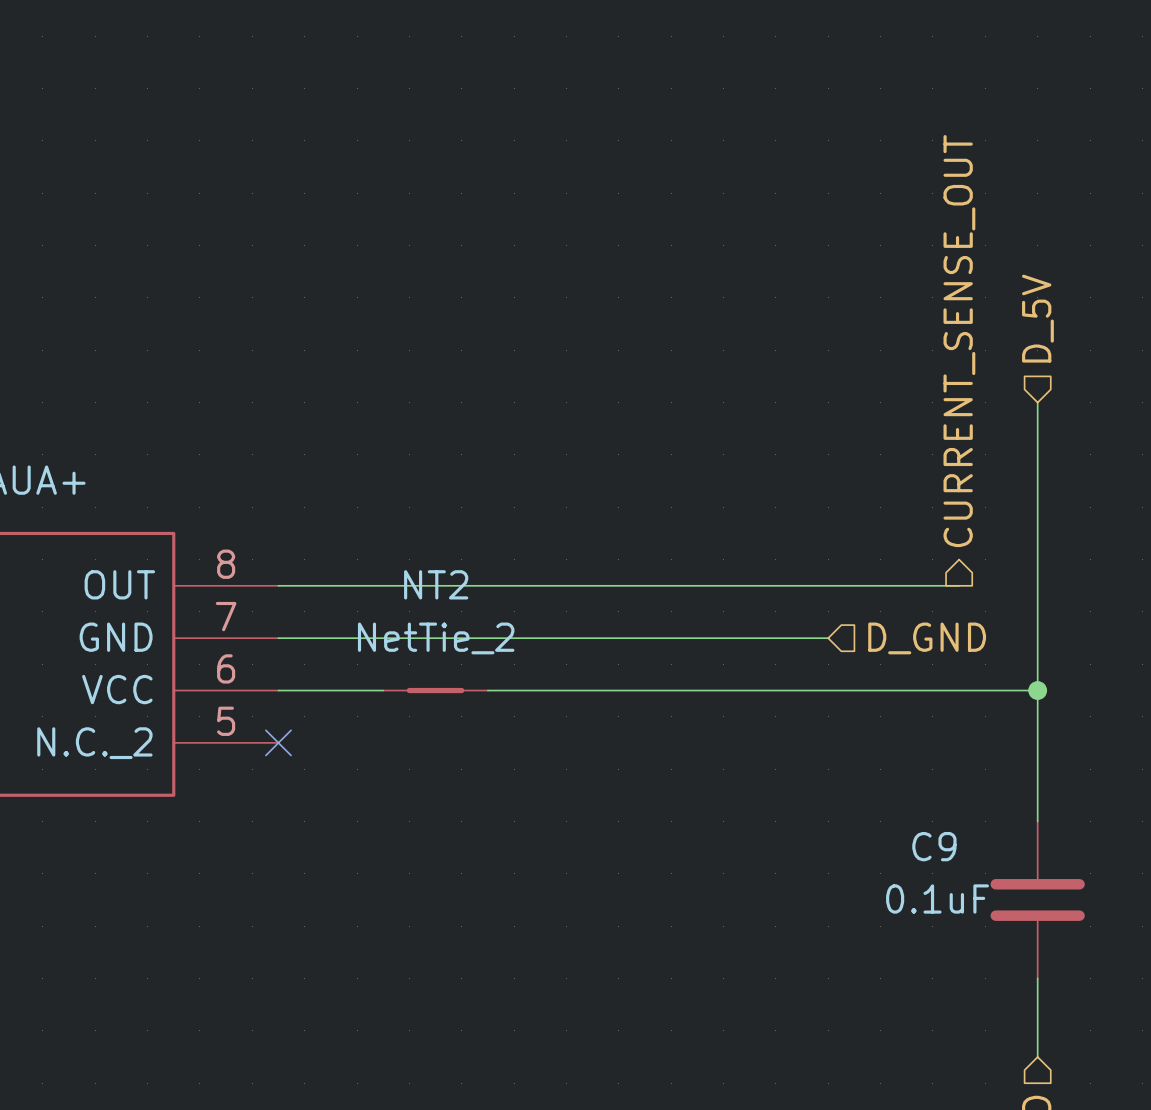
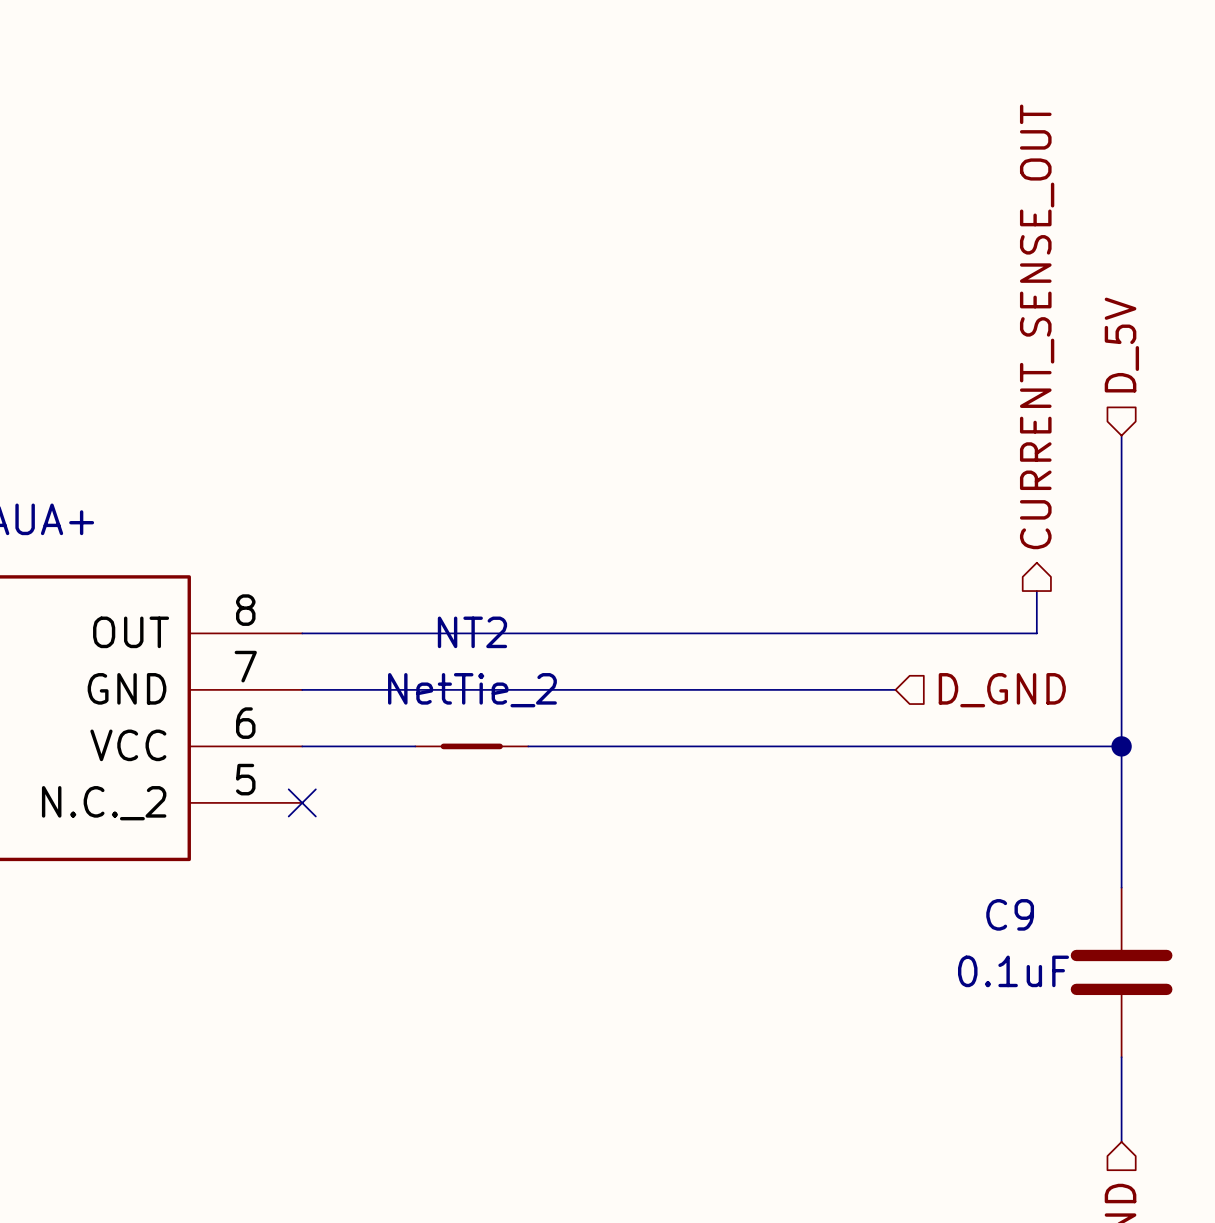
hierarchical label position: CURRENT_SENSE_OUT (959, 341) -> CURRENT_SENSE_OUT (1037, 326)
wire: none -> (1036, 591) (1036, 633)

